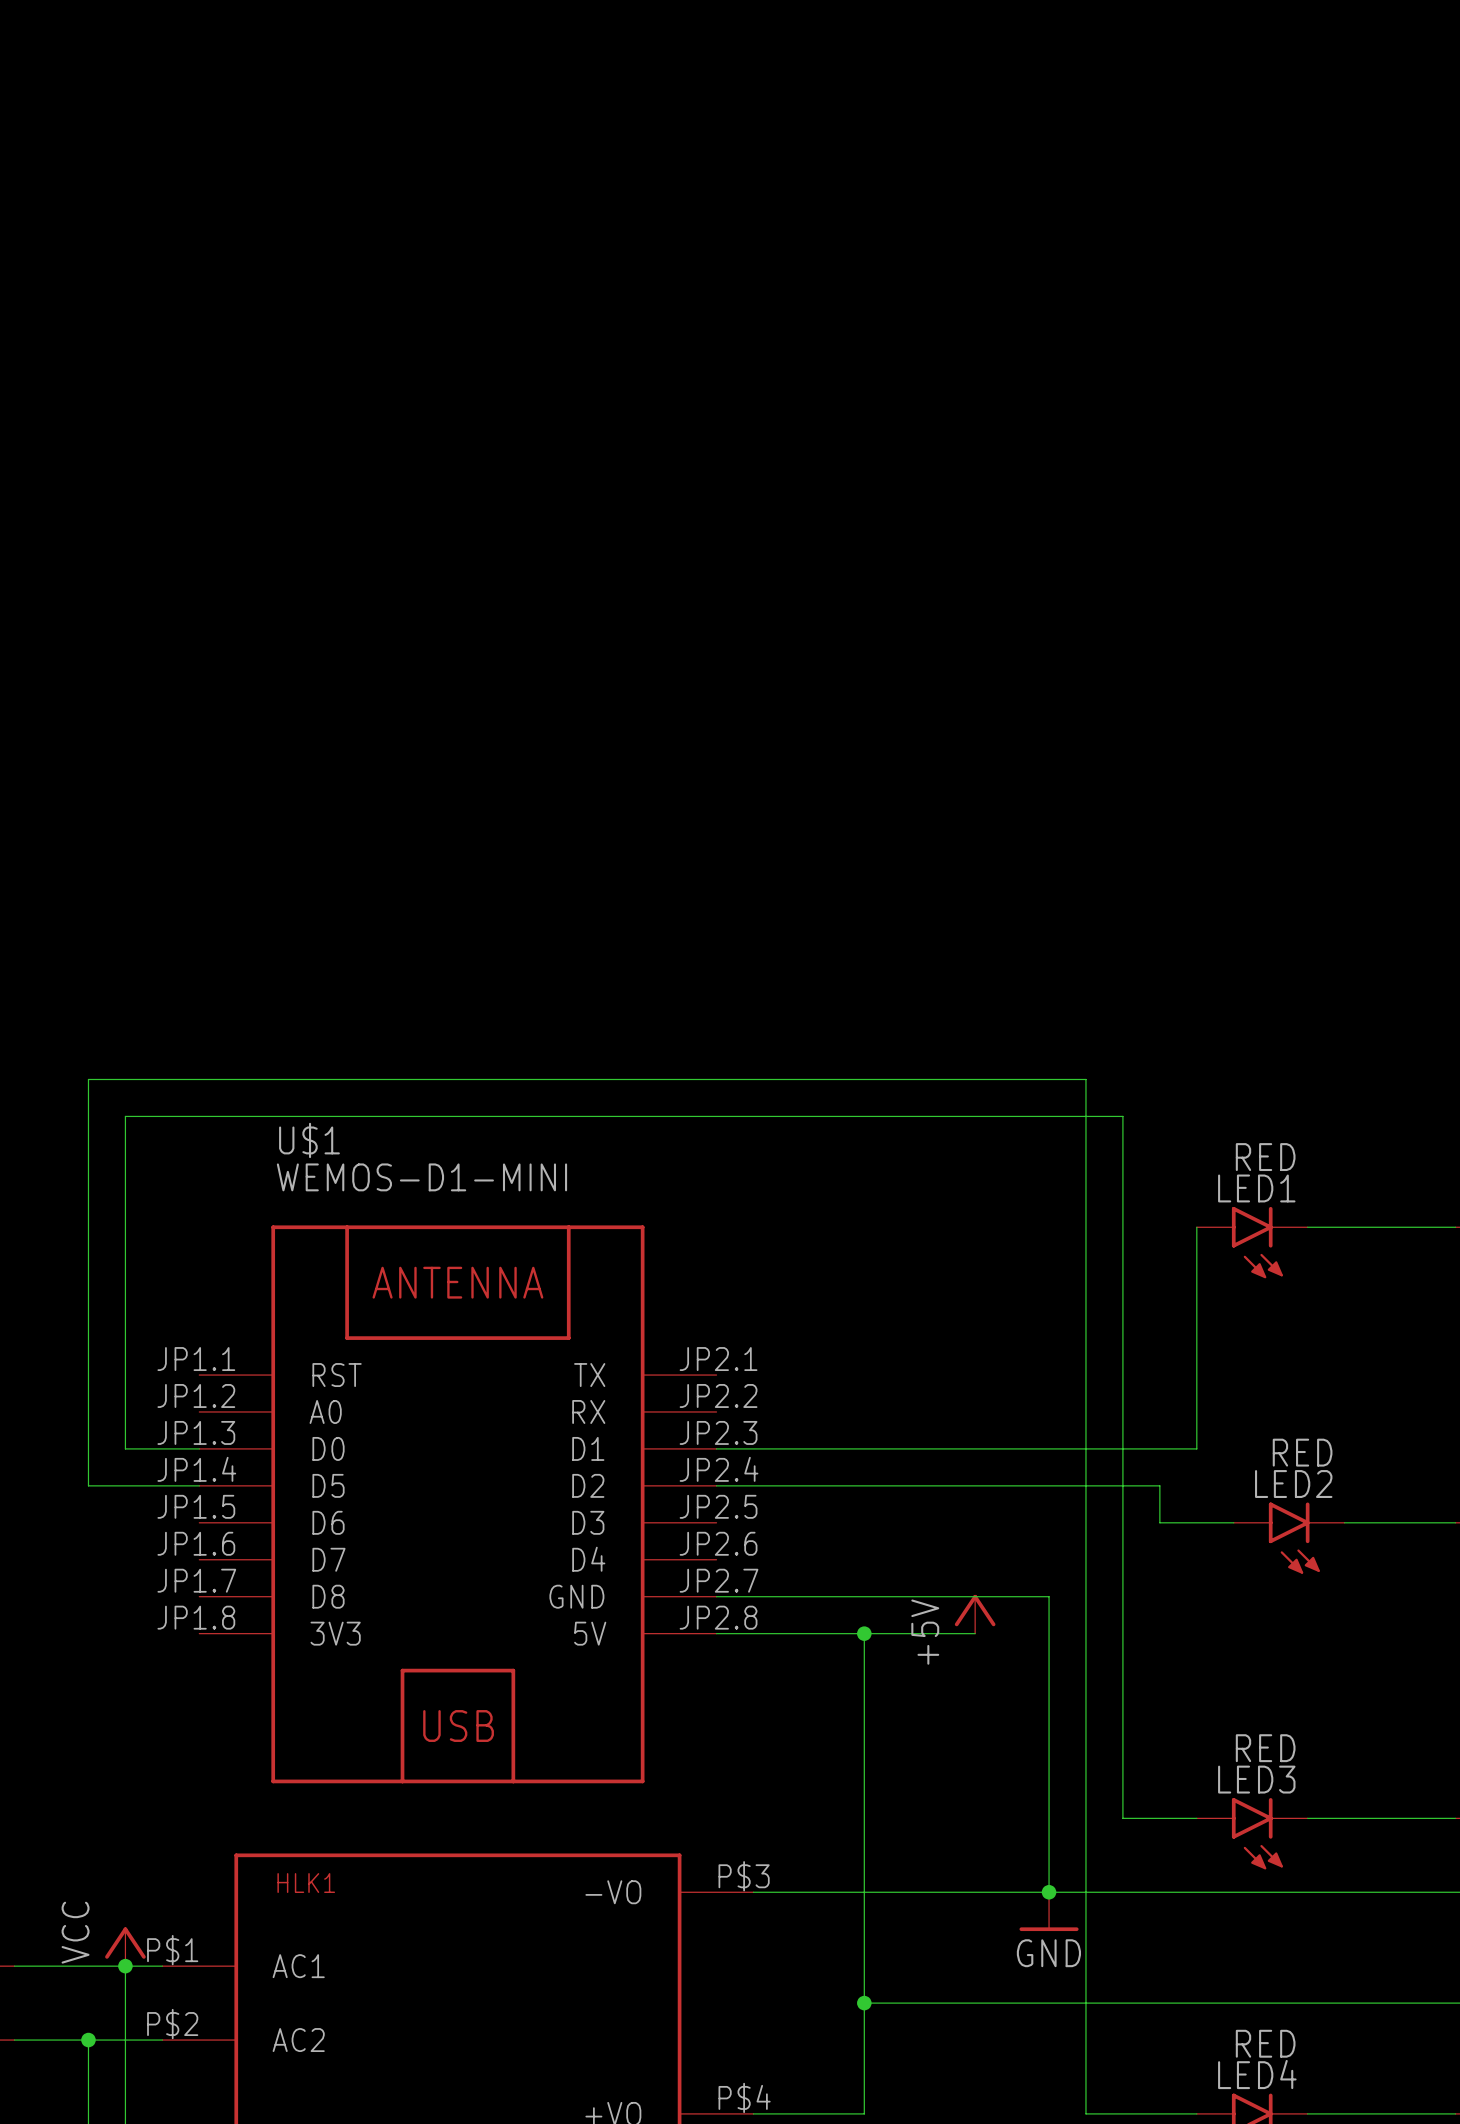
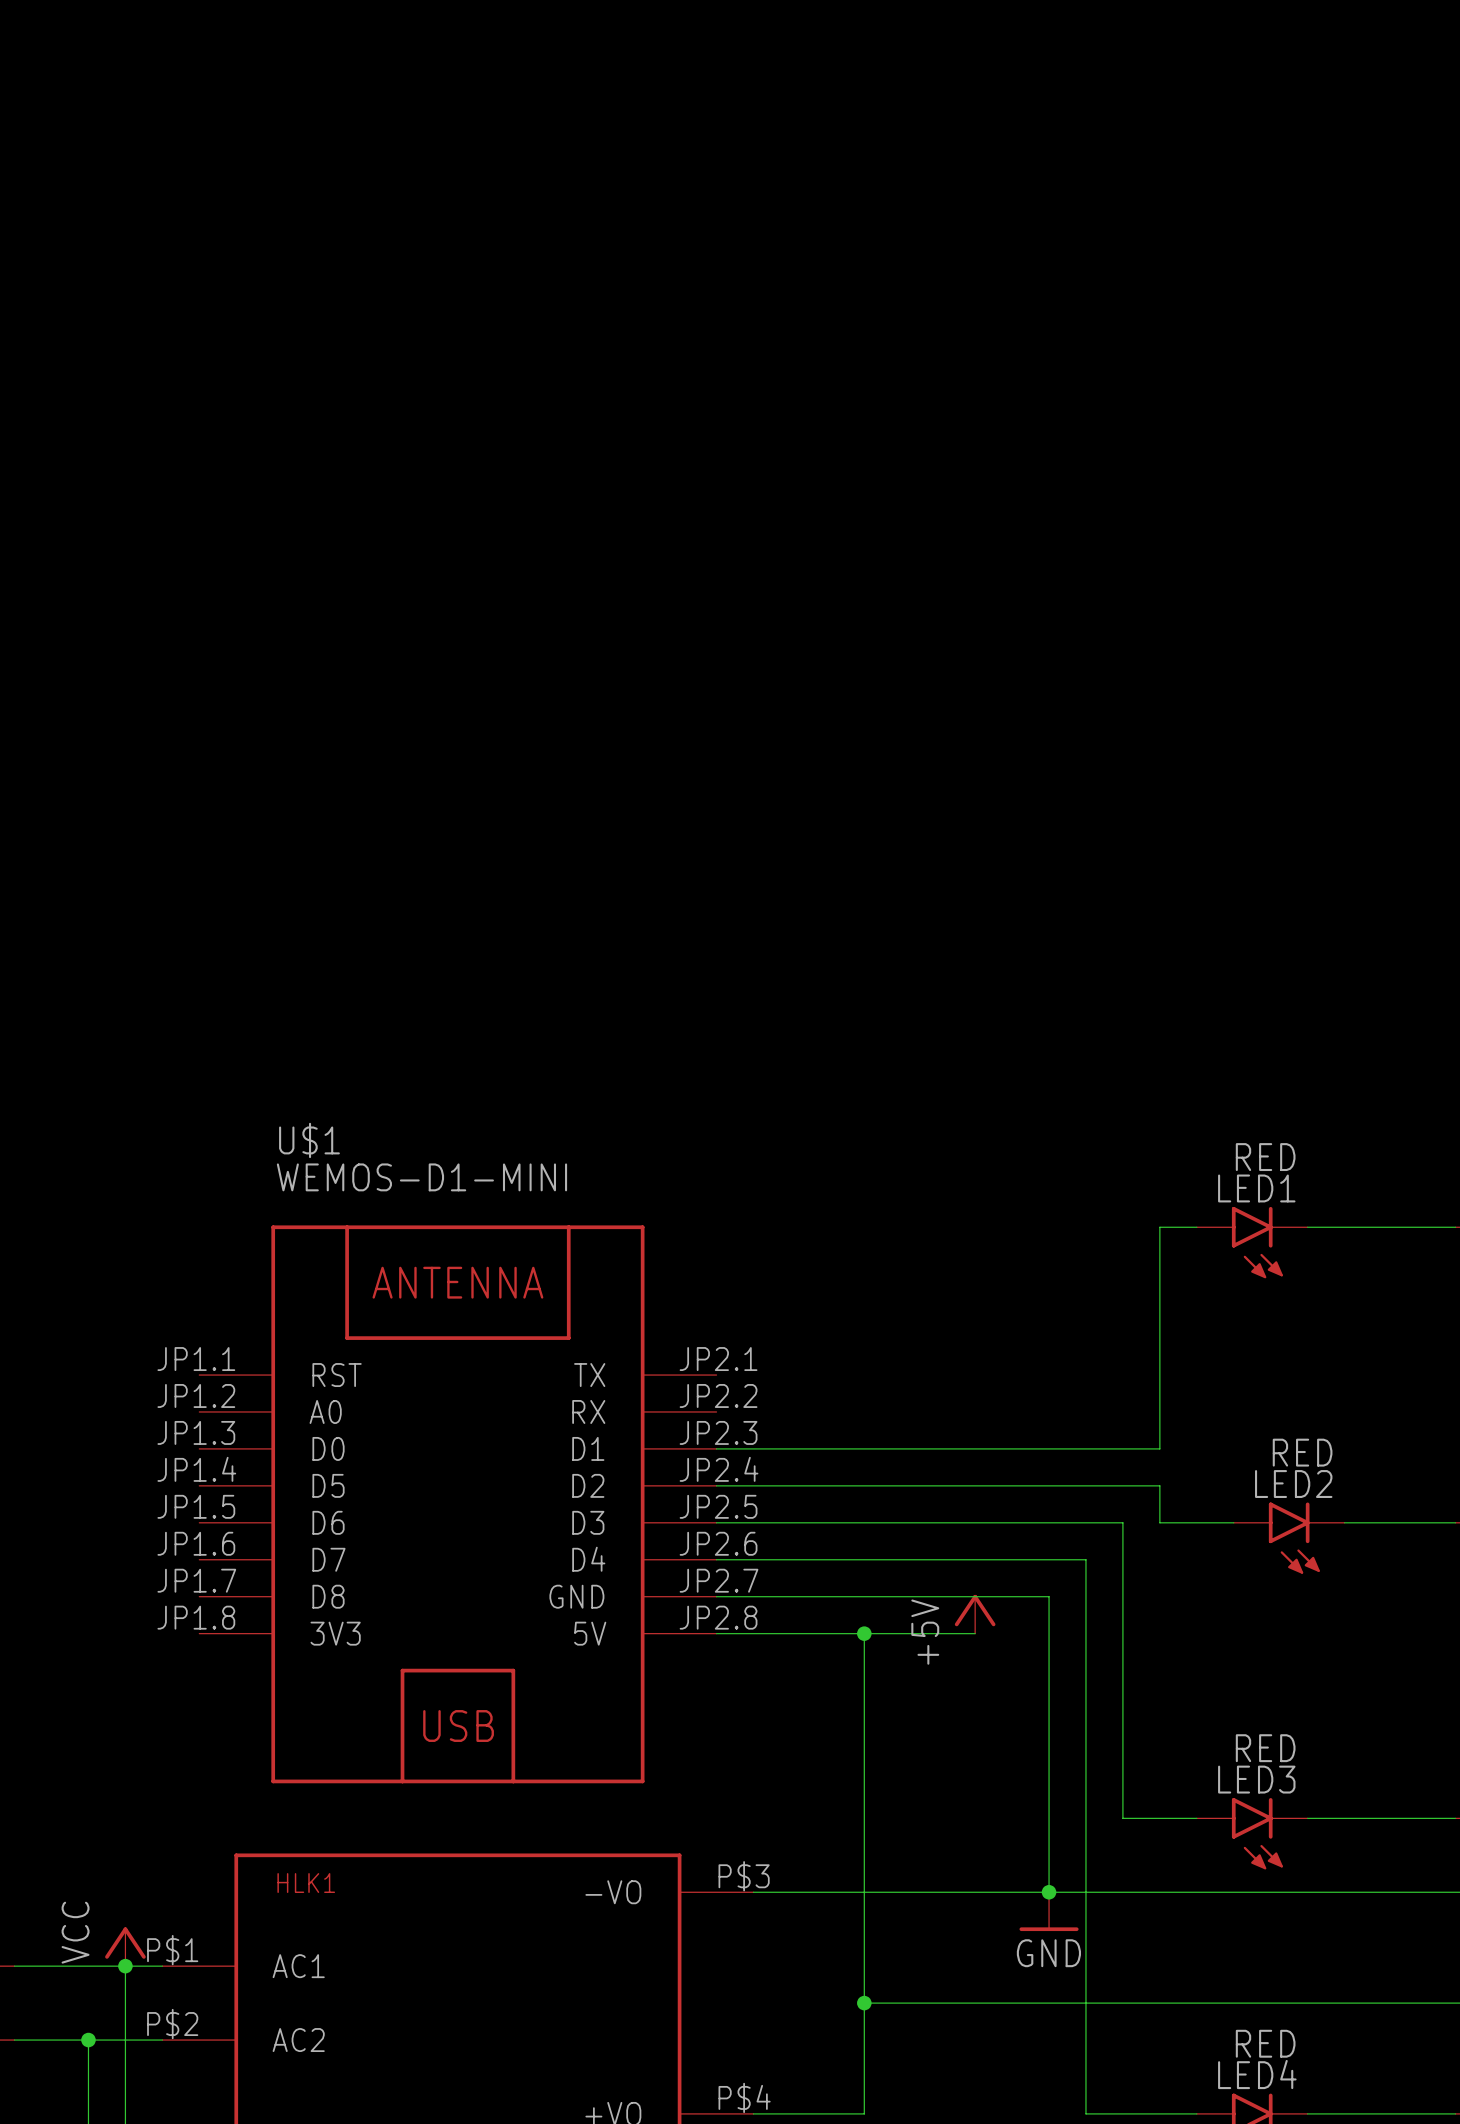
wire: (1196, 1227) (1196, 1448) (1159, 1448) -> (1196, 1227) (1159, 1227) (1159, 1448)
wire: (199, 1448) (125, 1448) (125, 1116) (1122, 1116) (1122, 1522) -> (716, 1522) (1122, 1522)
wire: (199, 1485) (88, 1485) (88, 1079) (1085, 1079) (1085, 1559) -> (716, 1559) (1085, 1559)

